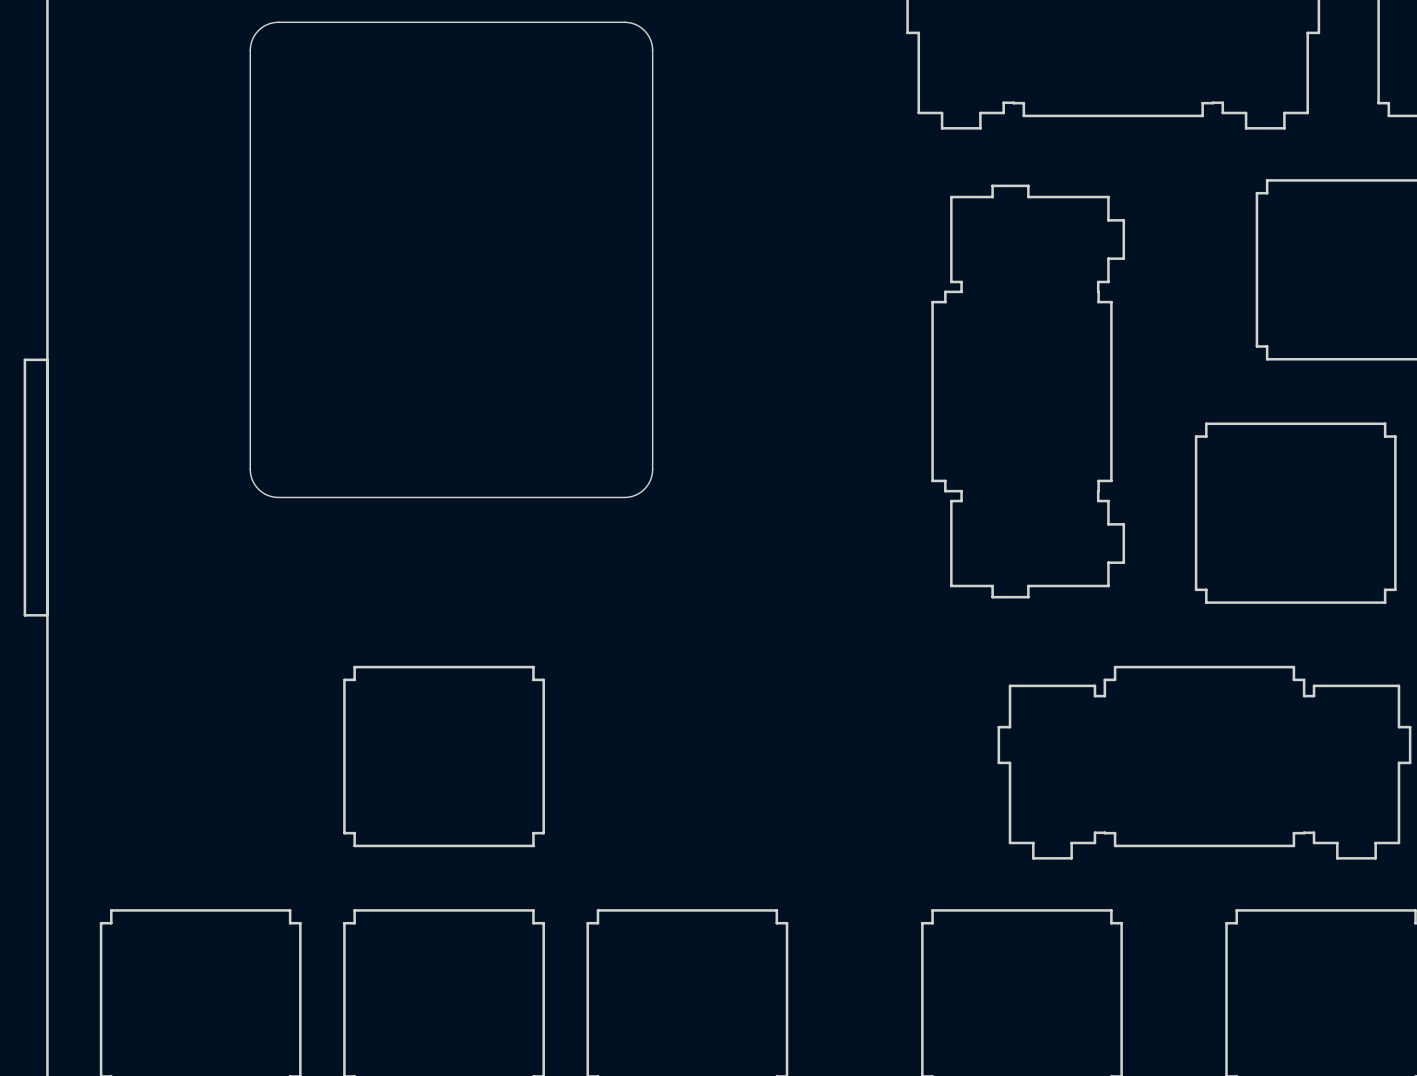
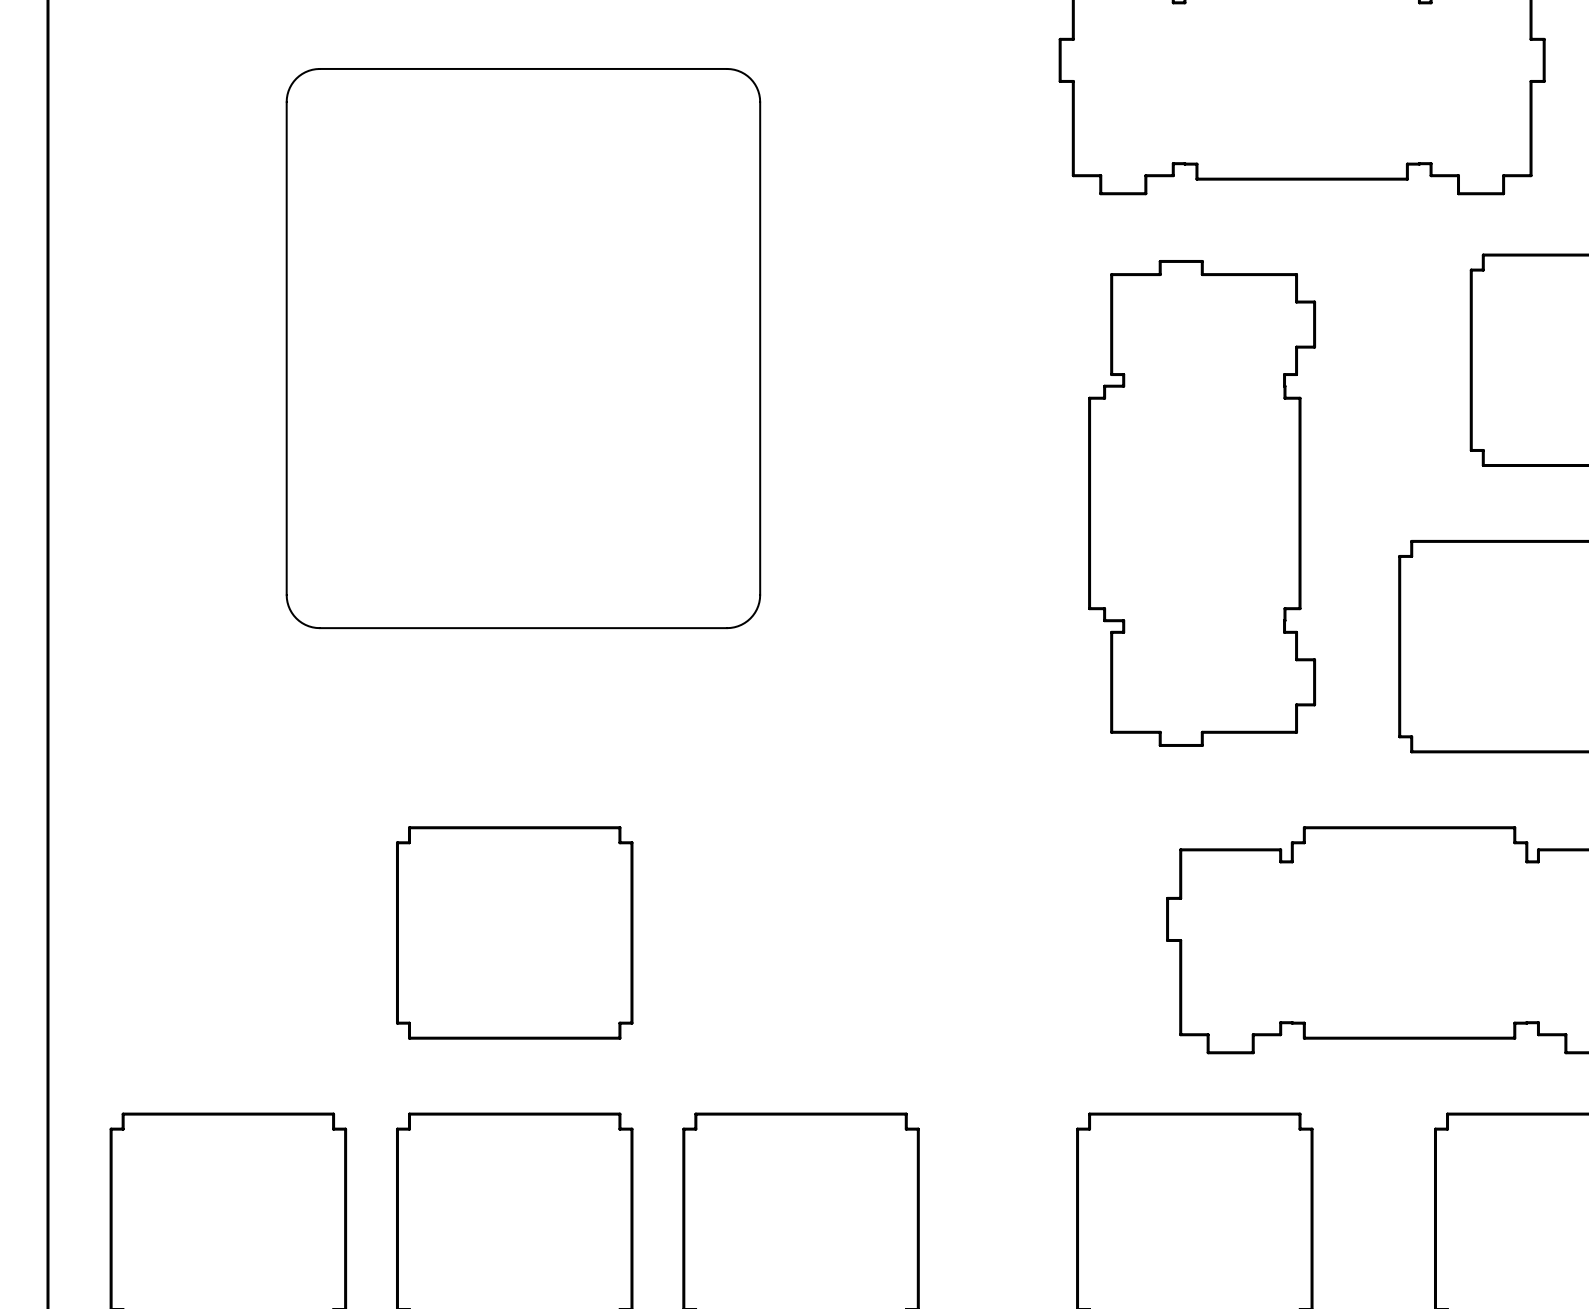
board edge: (47, 359) (24, 359) (24, 615) (47, 615) (47, 359) -> none

